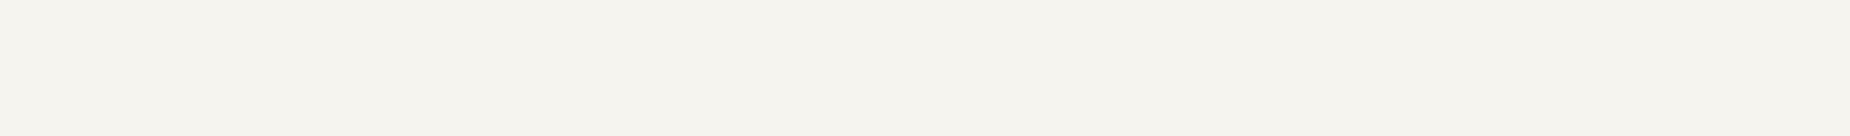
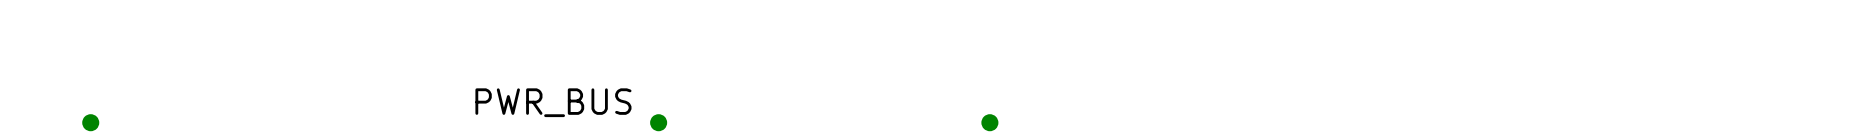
label: none -> PWR_BUS (553, 102)
junction: none -> (90, 122)
junction: none -> (658, 122)
junction: none -> (989, 122)

